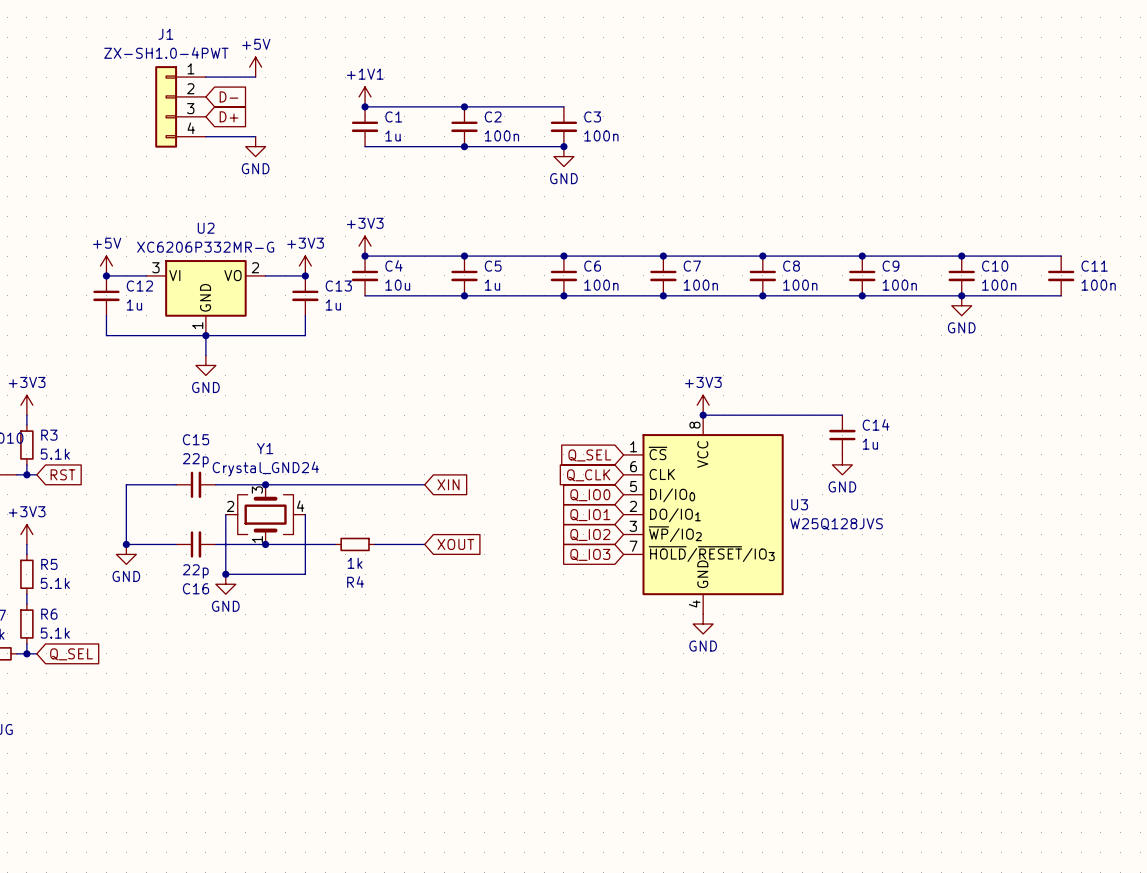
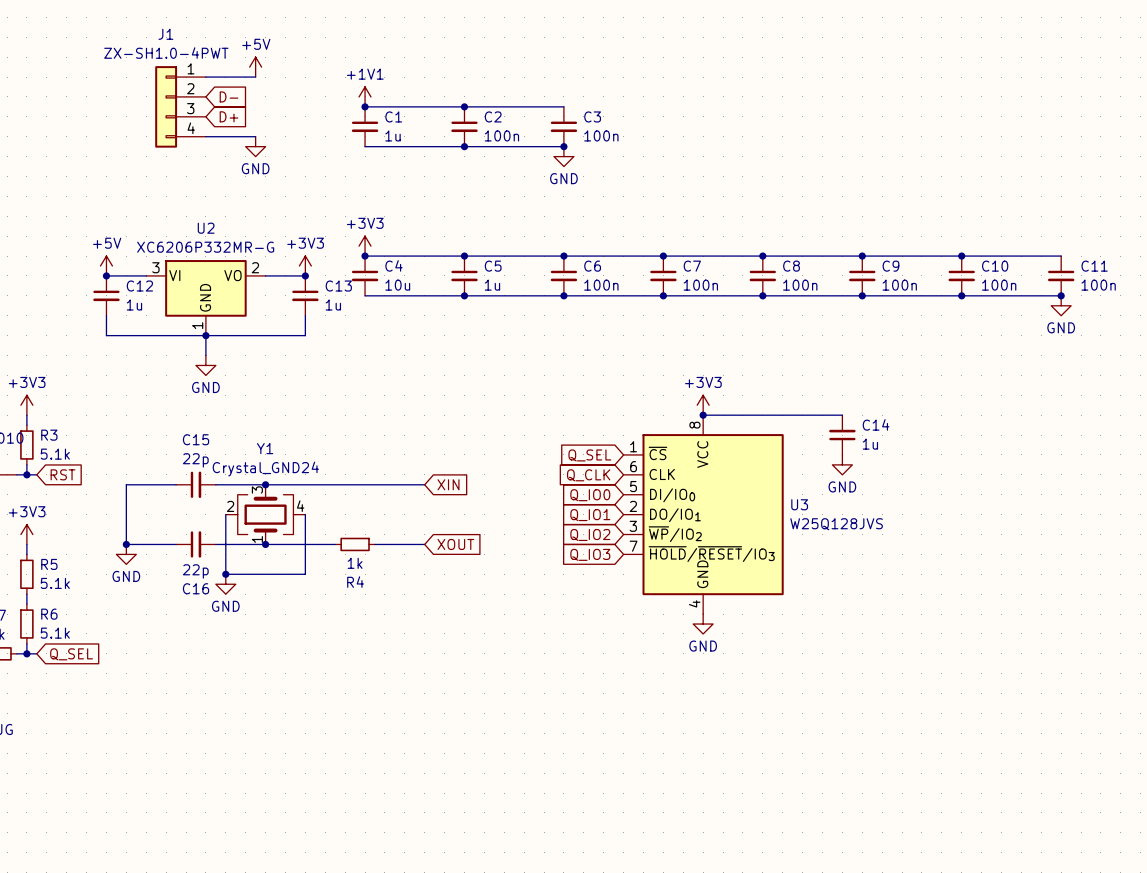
junction: none -> (1061, 295)
power symbol position: GND (961, 305) -> GND (1061, 305)

